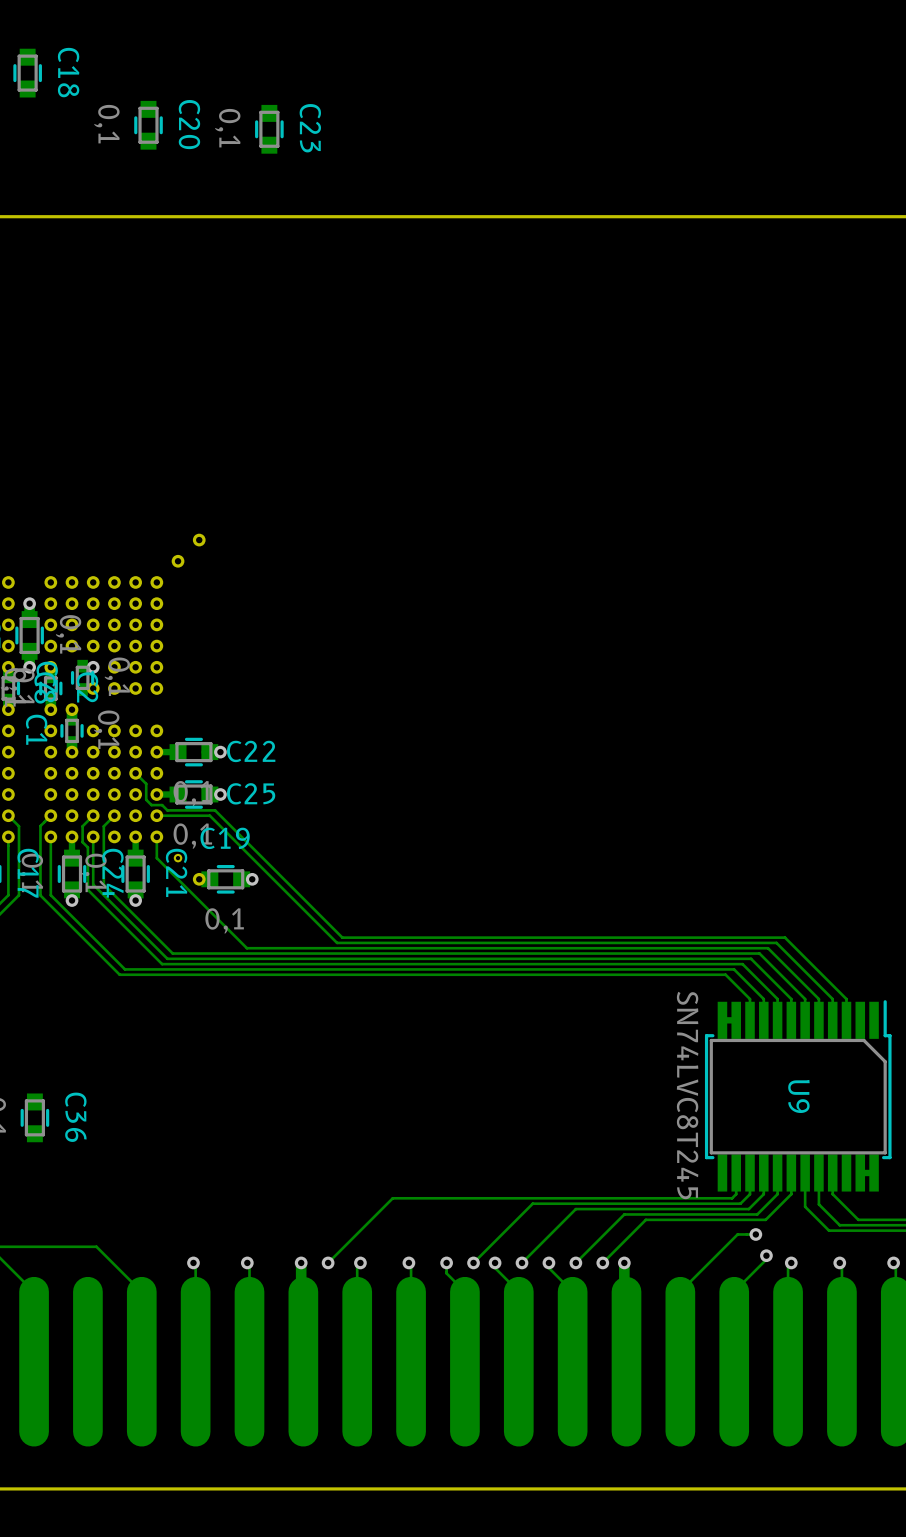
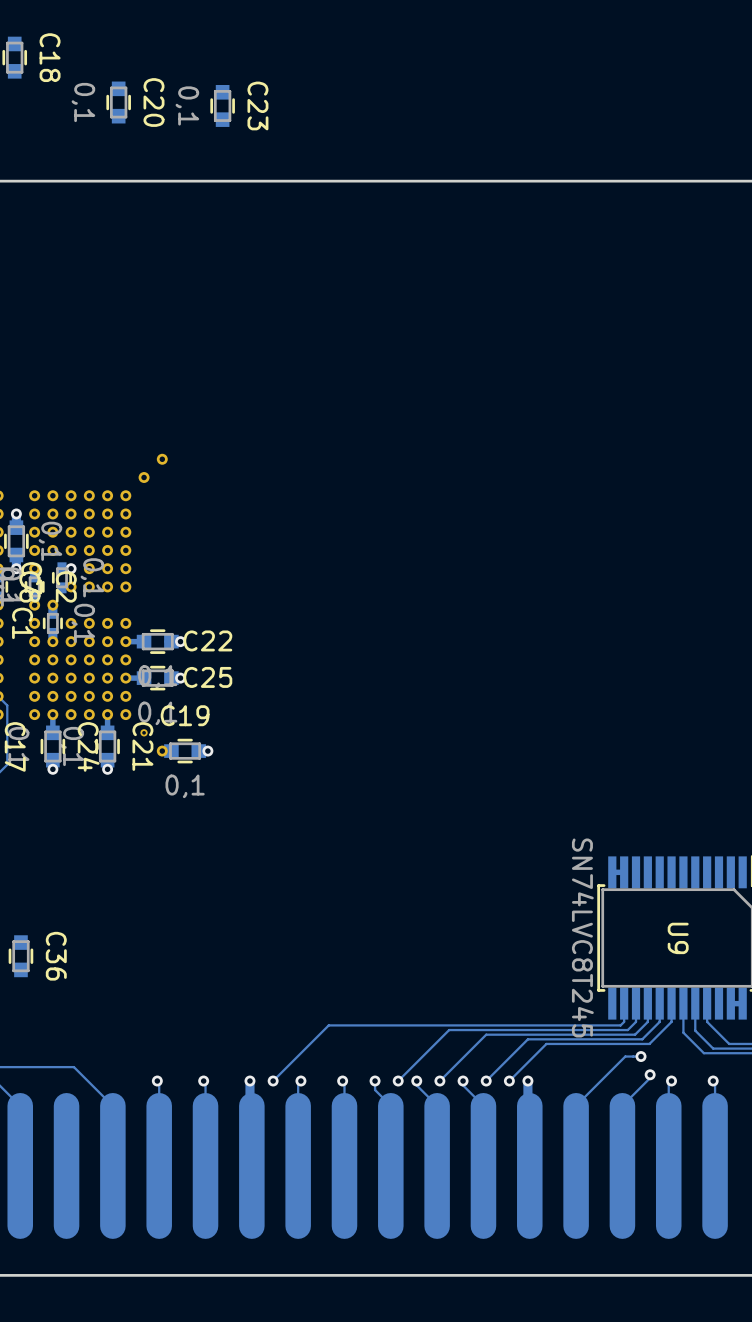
track: (135, 773) (146, 783) (146, 799) (151, 805) (162, 805) (167, 810) (215, 810) (342, 937) (785, 937) (846, 999) (846, 1020) -> none
track: (50, 815) (40, 826) (40, 895) (119, 974) (725, 974) (750, 999) (750, 1020) -> none
track: (93, 815) (82, 826) (82, 842) (87, 847) (87, 889) (162, 964) (742, 964) (777, 999) (777, 1020) -> none
track: (114, 815) (103, 826) (103, 884) (172, 953) (759, 953) (805, 999) (805, 1020) -> none
track: (156, 815) (209, 815) (337, 942) (776, 942) (832, 999) (832, 1020) -> none
track: (50, 836) (50, 895) (125, 969) (734, 969) (763, 999) (763, 1020) -> none
track: (93, 836) (93, 884) (167, 958) (751, 958) (791, 999) (791, 1020) -> none
track: (156, 836) (156, 858) (246, 948) (768, 948) (818, 999) (818, 1020) -> none

